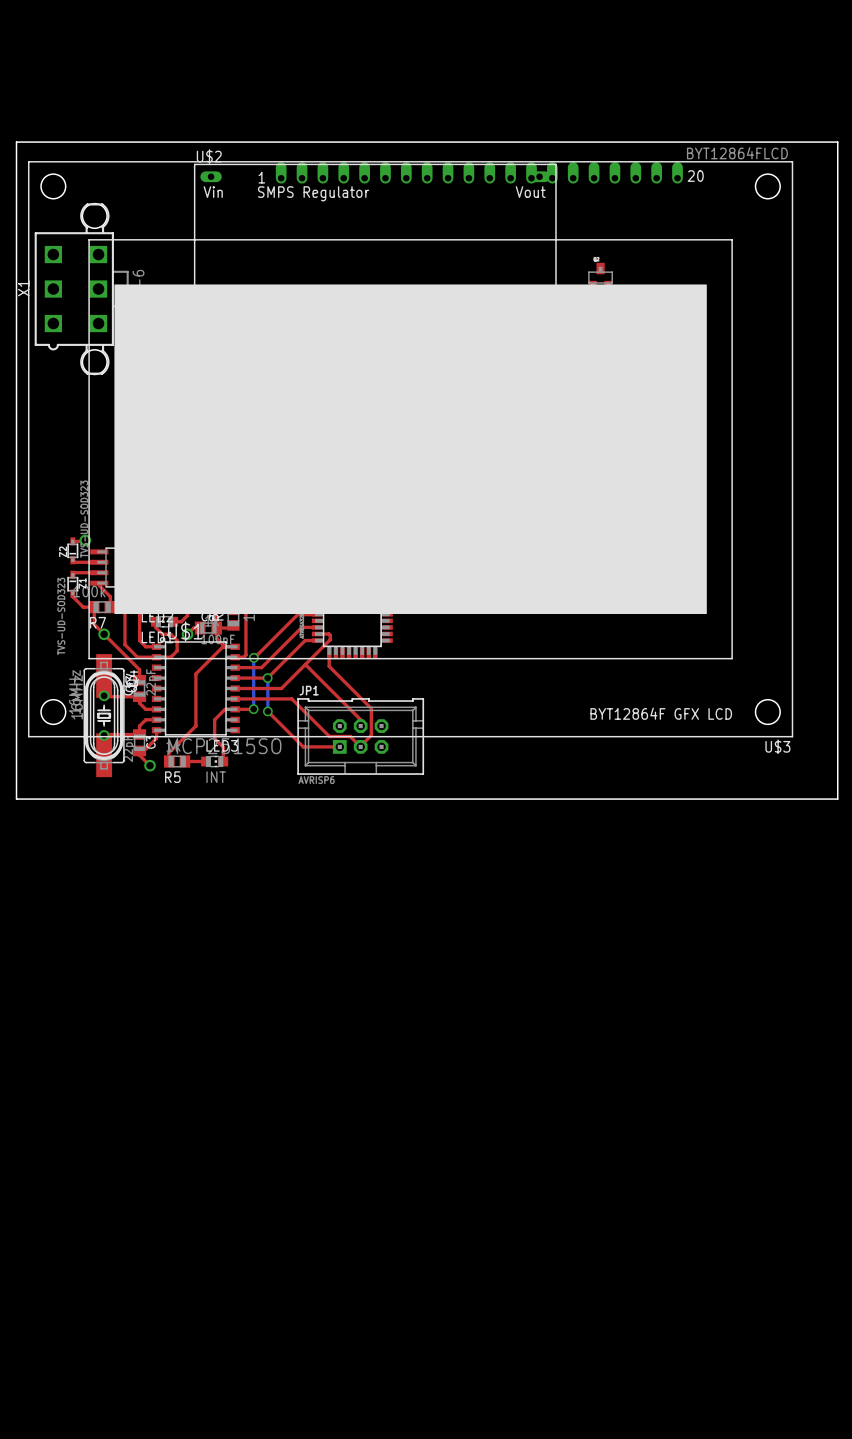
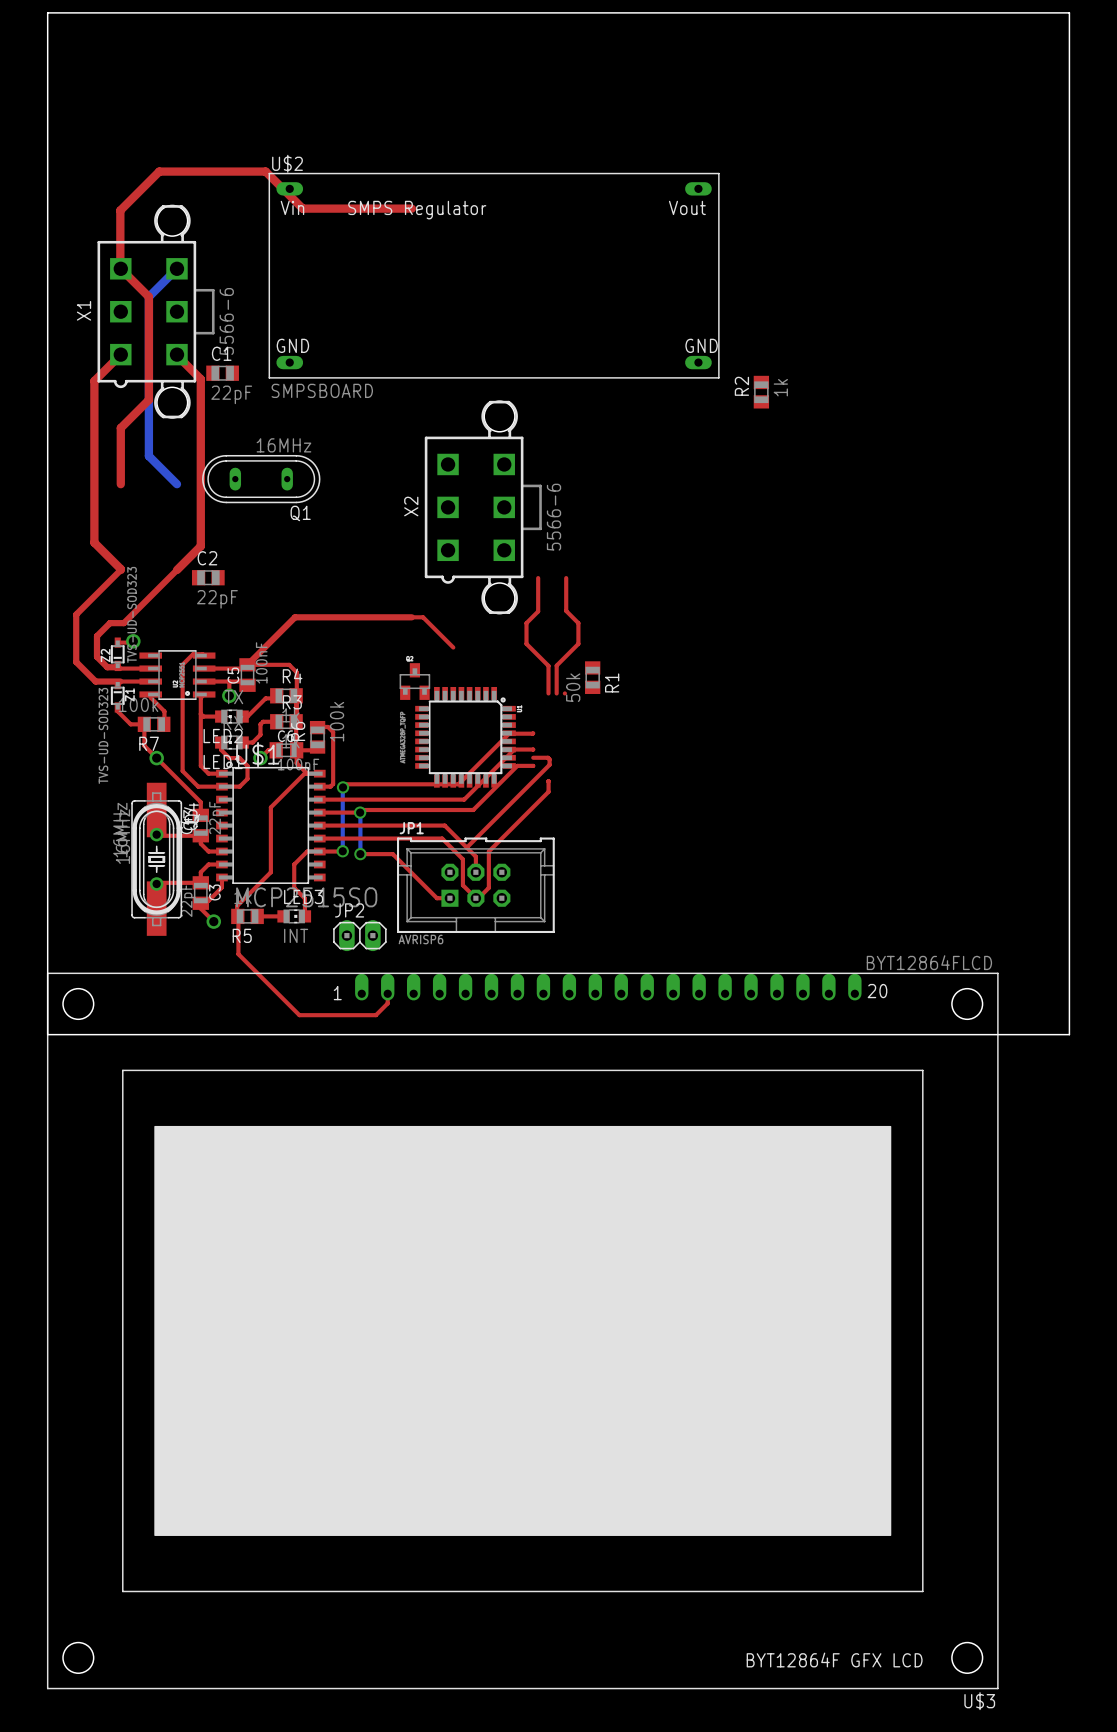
board edge: (16, 142) (837, 142) -> (47, 145) (47, 12) (1069, 12) (1069, 145)
top track: none -> (411, 208) (302, 208) (265, 171) (159, 171) (120, 210) (120, 268) (148, 296) (148, 399) (120, 428) (120, 484)
bottom track: none -> (176, 268) (148, 296) (148, 456) (176, 484)
part position: (600, 277) -> (414, 681)
X1 position: (81, 289) -> (156, 311)
top track: none -> (120, 354) (94, 381) (94, 542) (120, 570) (76, 614) (76, 662) (95, 681) (120, 681)
top track: none -> (176, 354) (200, 379) (200, 546) (123, 623) (109, 623) (96, 636) (96, 656) (107, 667) (117, 665)
U$3 position: (410, 449) -> (522, 1330)
top track: none -> (538, 578) (538, 611) (526, 623) (526, 643) (548, 665) (548, 693)
top track: none -> (566, 578) (566, 610) (578, 623) (578, 643) (556, 665) (556, 693)
top track: none -> (453, 647) (423, 617) (295, 617) (247, 664)
top track: (317, 614) (297, 614) (257, 655) -> (533, 733) (509, 733) (458, 784) (346, 784)
top track: (317, 627) (301, 627) (261, 667) -> (533, 749) (514, 749) (464, 799) (352, 799)
top track: (317, 634) (328, 634) (330, 639) (281, 688) -> none
top track: none -> (533, 757) (547, 757) (549, 764) (466, 847)
top track: (317, 640) (305, 640) (269, 675) -> (533, 765) (517, 765) (473, 810) (362, 810)
top track: (329, 652) (329, 666) (371, 708) (371, 735) (360, 746) -> (548, 781) (548, 791) (488, 851) (488, 887) (478, 898) (475, 898)
top track: (305, 664) (360, 719) (360, 726) -> (377, 825) (444, 825) (475, 856) (475, 872)
top track: (291, 698) (329, 736) (350, 736) -> (390, 838) (442, 838) (462, 859) (462, 885)
top track: (267, 711) (303, 746) (329, 746) -> (360, 854) (392, 854) (436, 898)
top track: none -> (237, 911) (238, 954) (299, 1015) (375, 1015) (387, 1003) (387, 993)
JP2: none -> (359, 935)
board edge: (16, 799) (837, 799) -> (47, 963) (47, 1034) (1069, 1034) (1069, 963)

